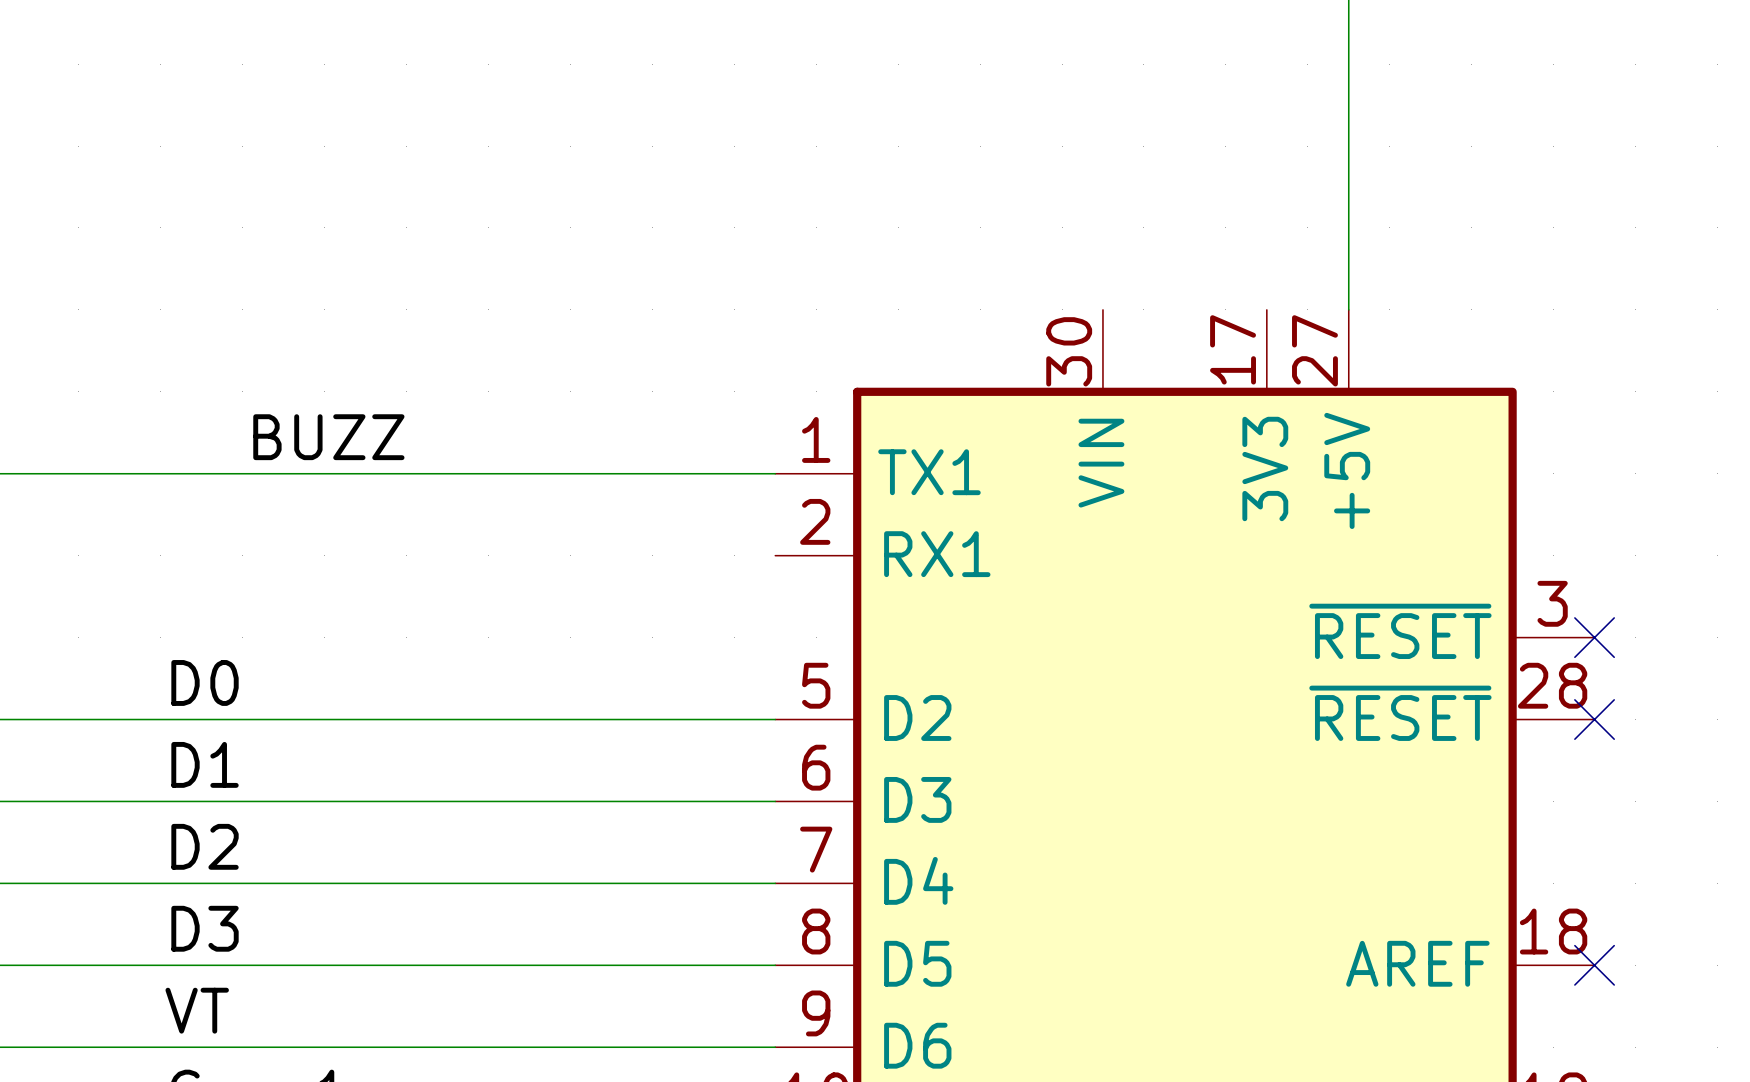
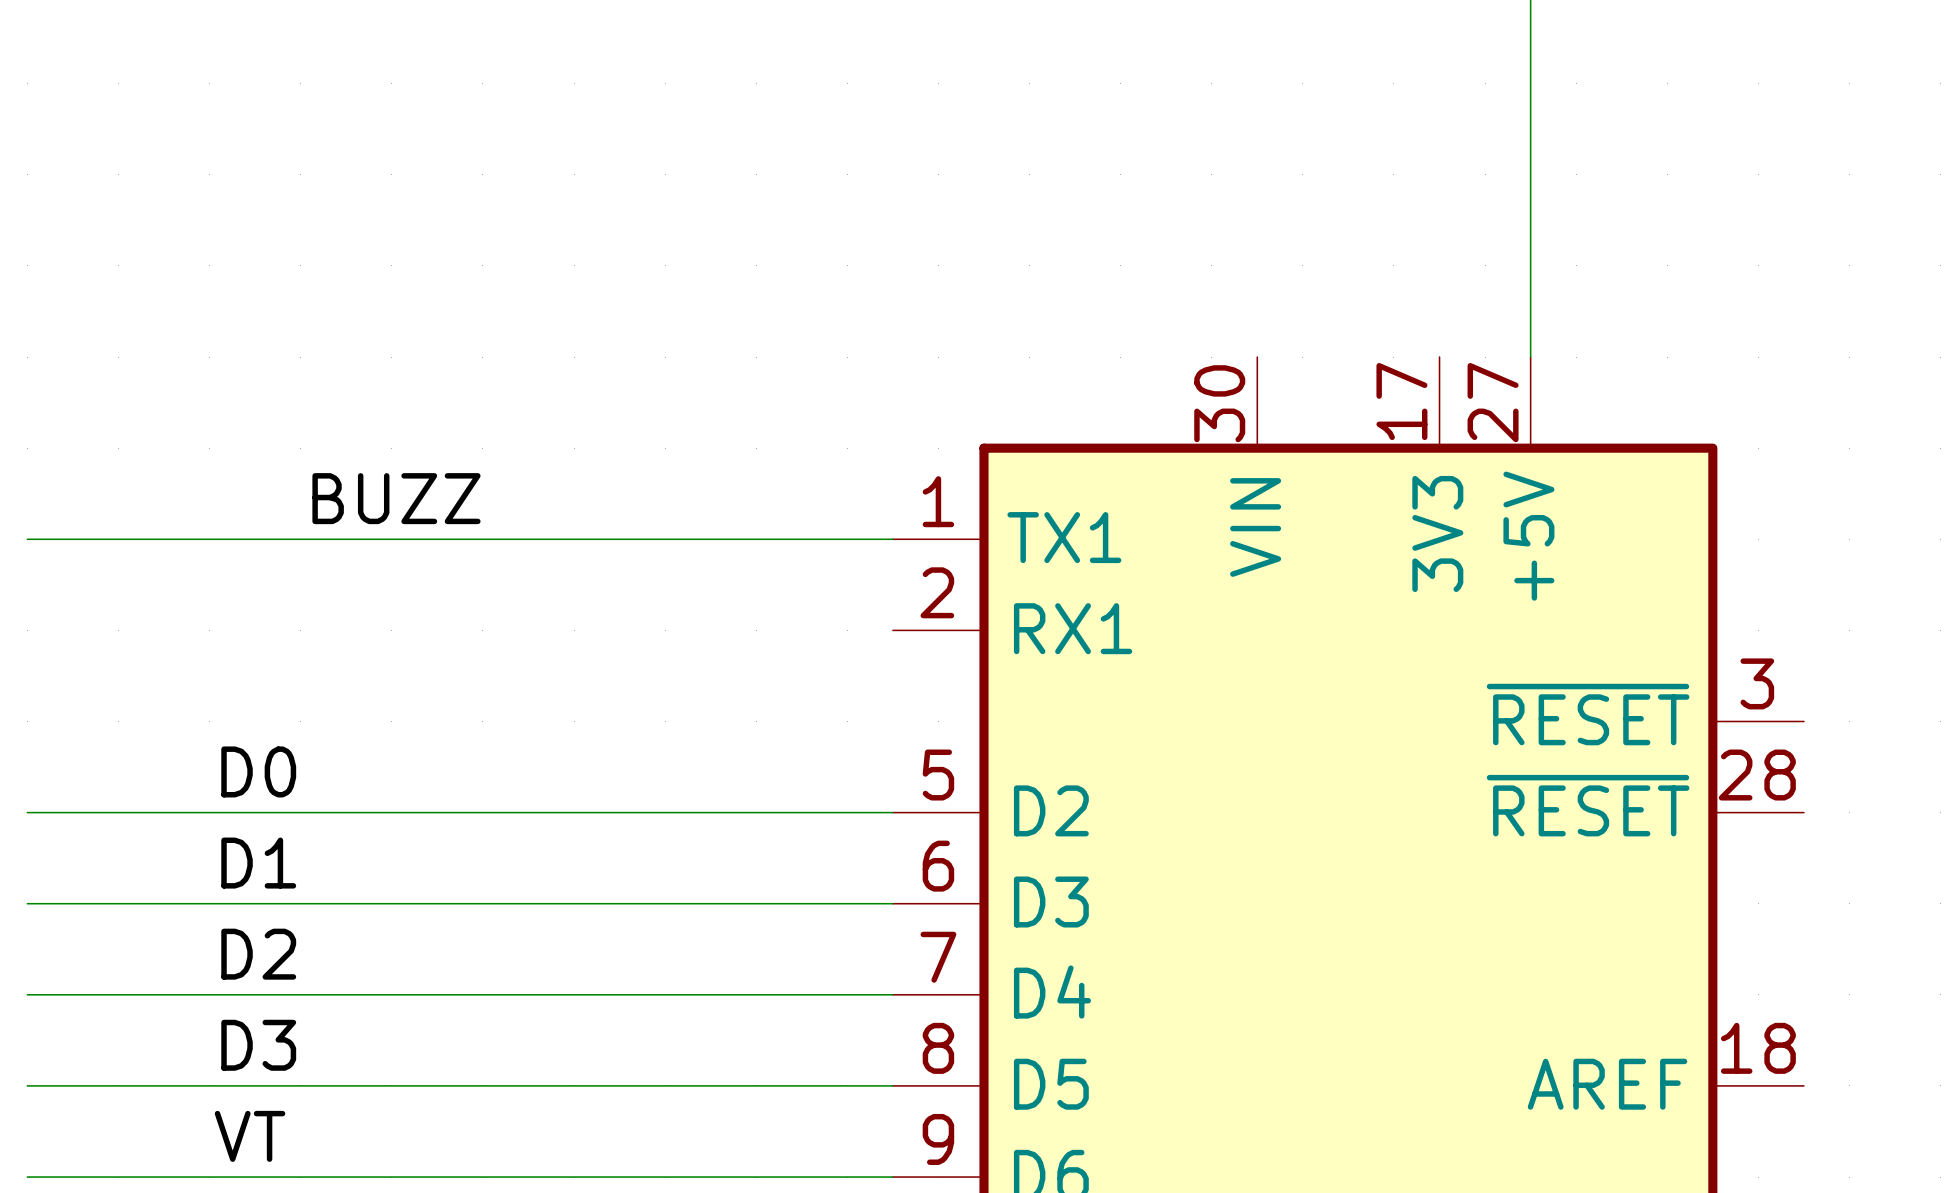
no-connect mark: (1594, 637) -> none
no-connect mark: (1594, 719) -> none
no-connect mark: (1594, 965) -> none

